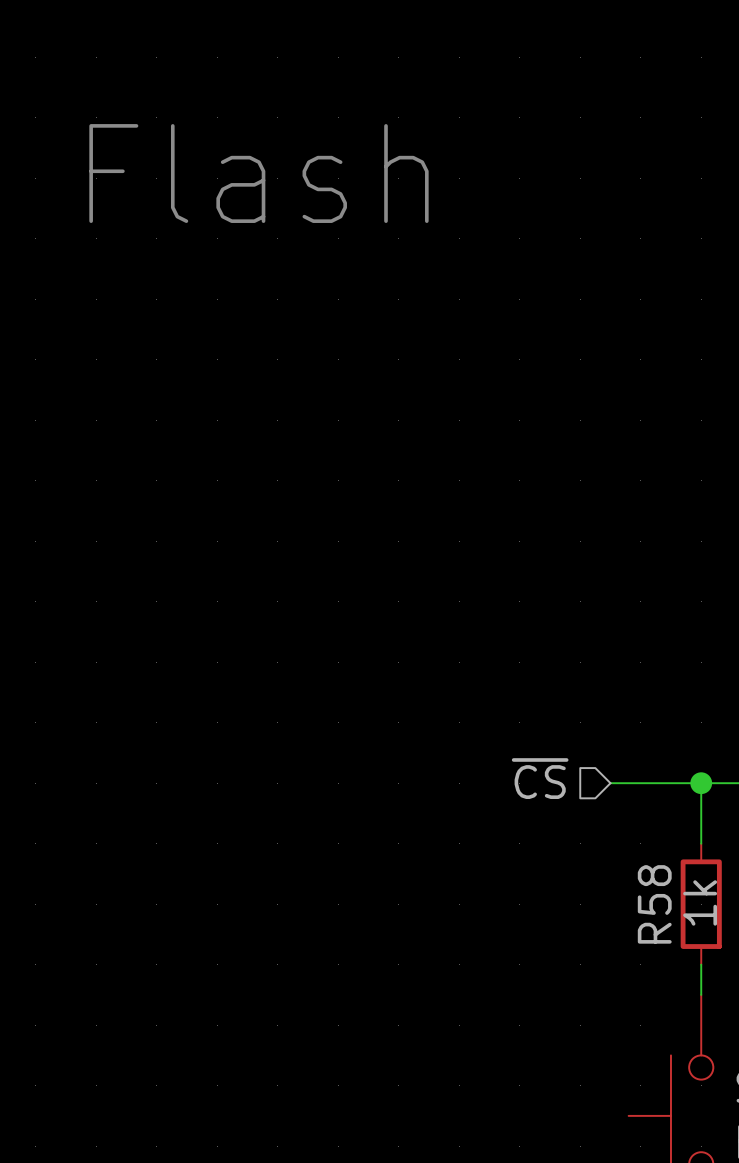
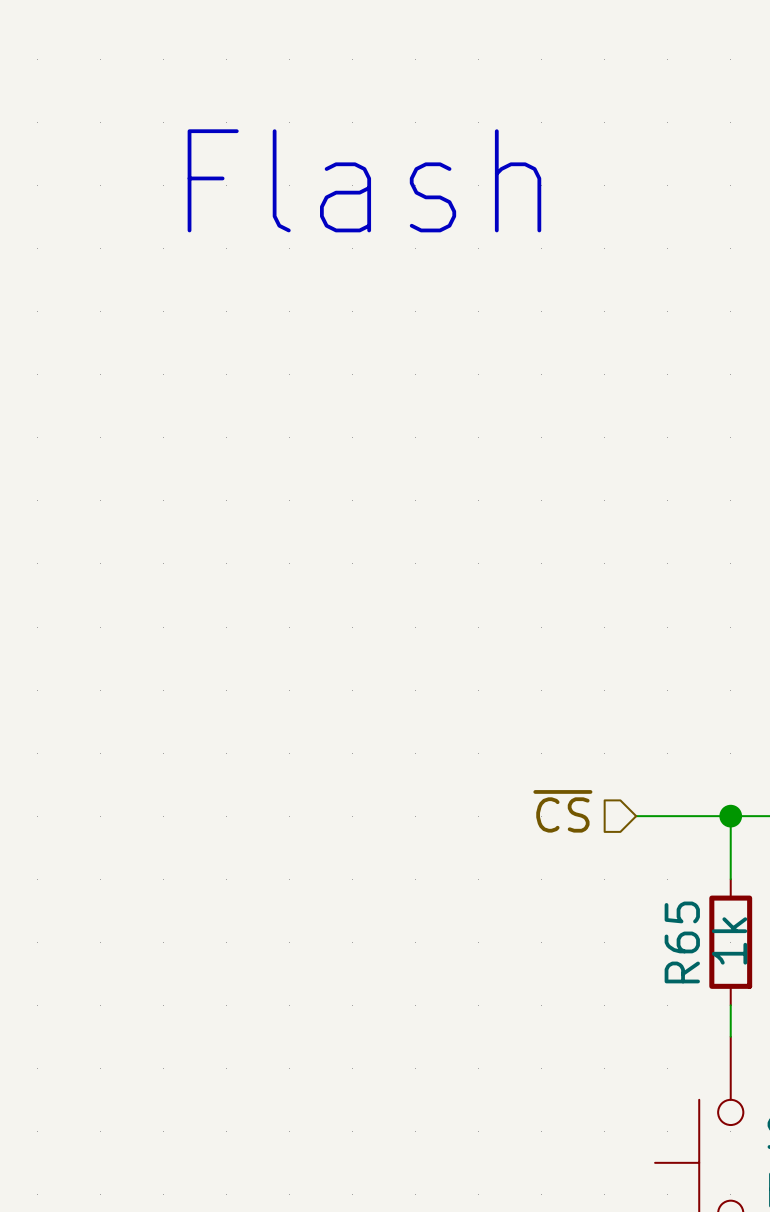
text position: Flash (258, 173) -> Flash (364, 180)
R58 name: R58 (654, 904) -> R65 (682, 942)

